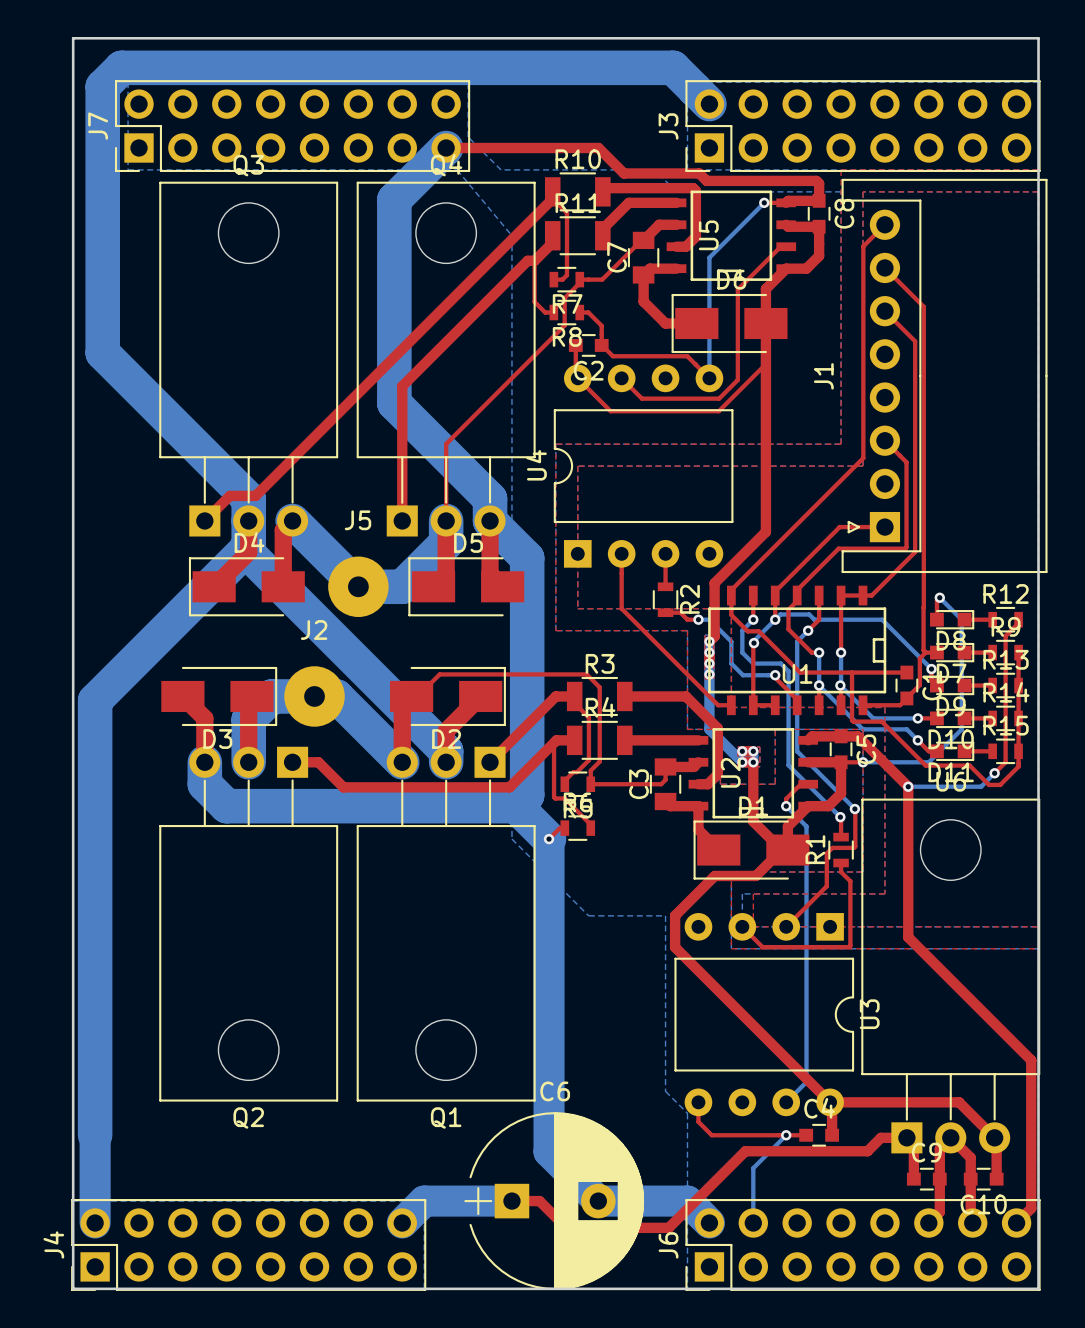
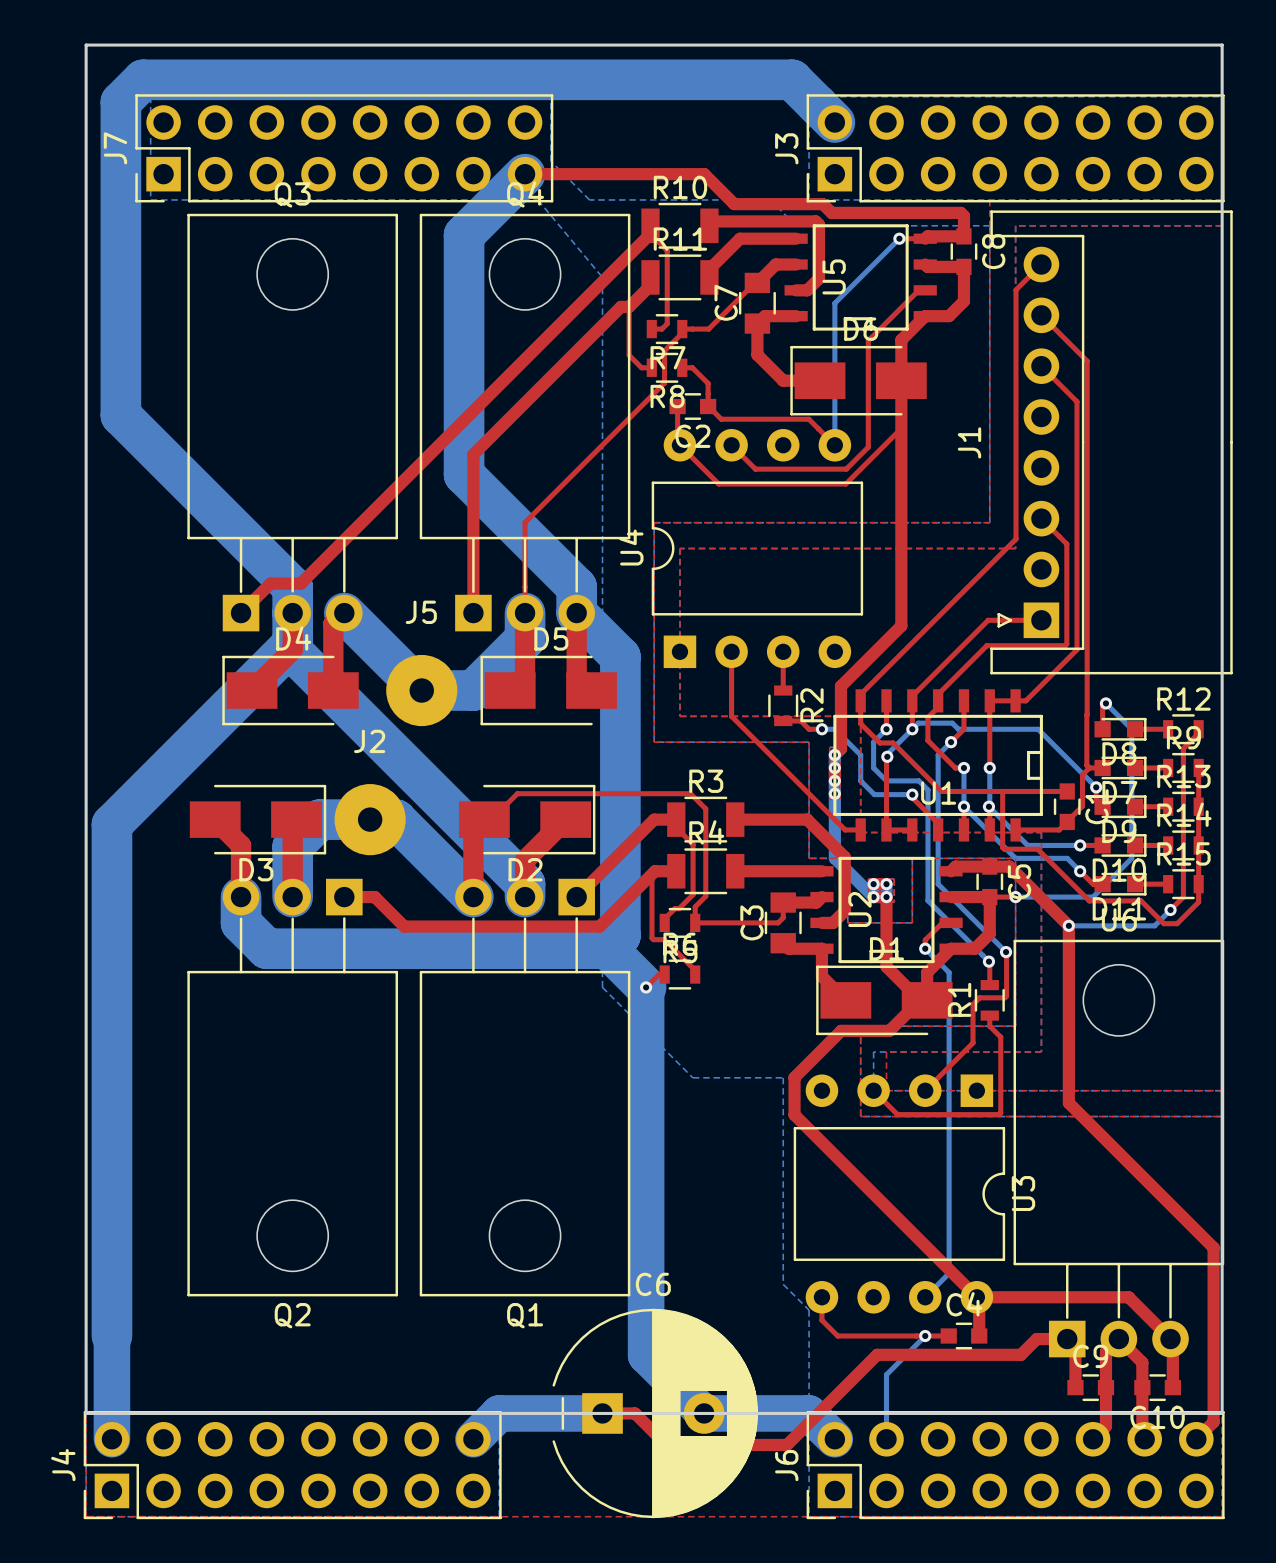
board edge: (73, 1201) (73, 1288) (1038, 1288) (1038, 1201) -> (86, 1413) (1222, 1413)

